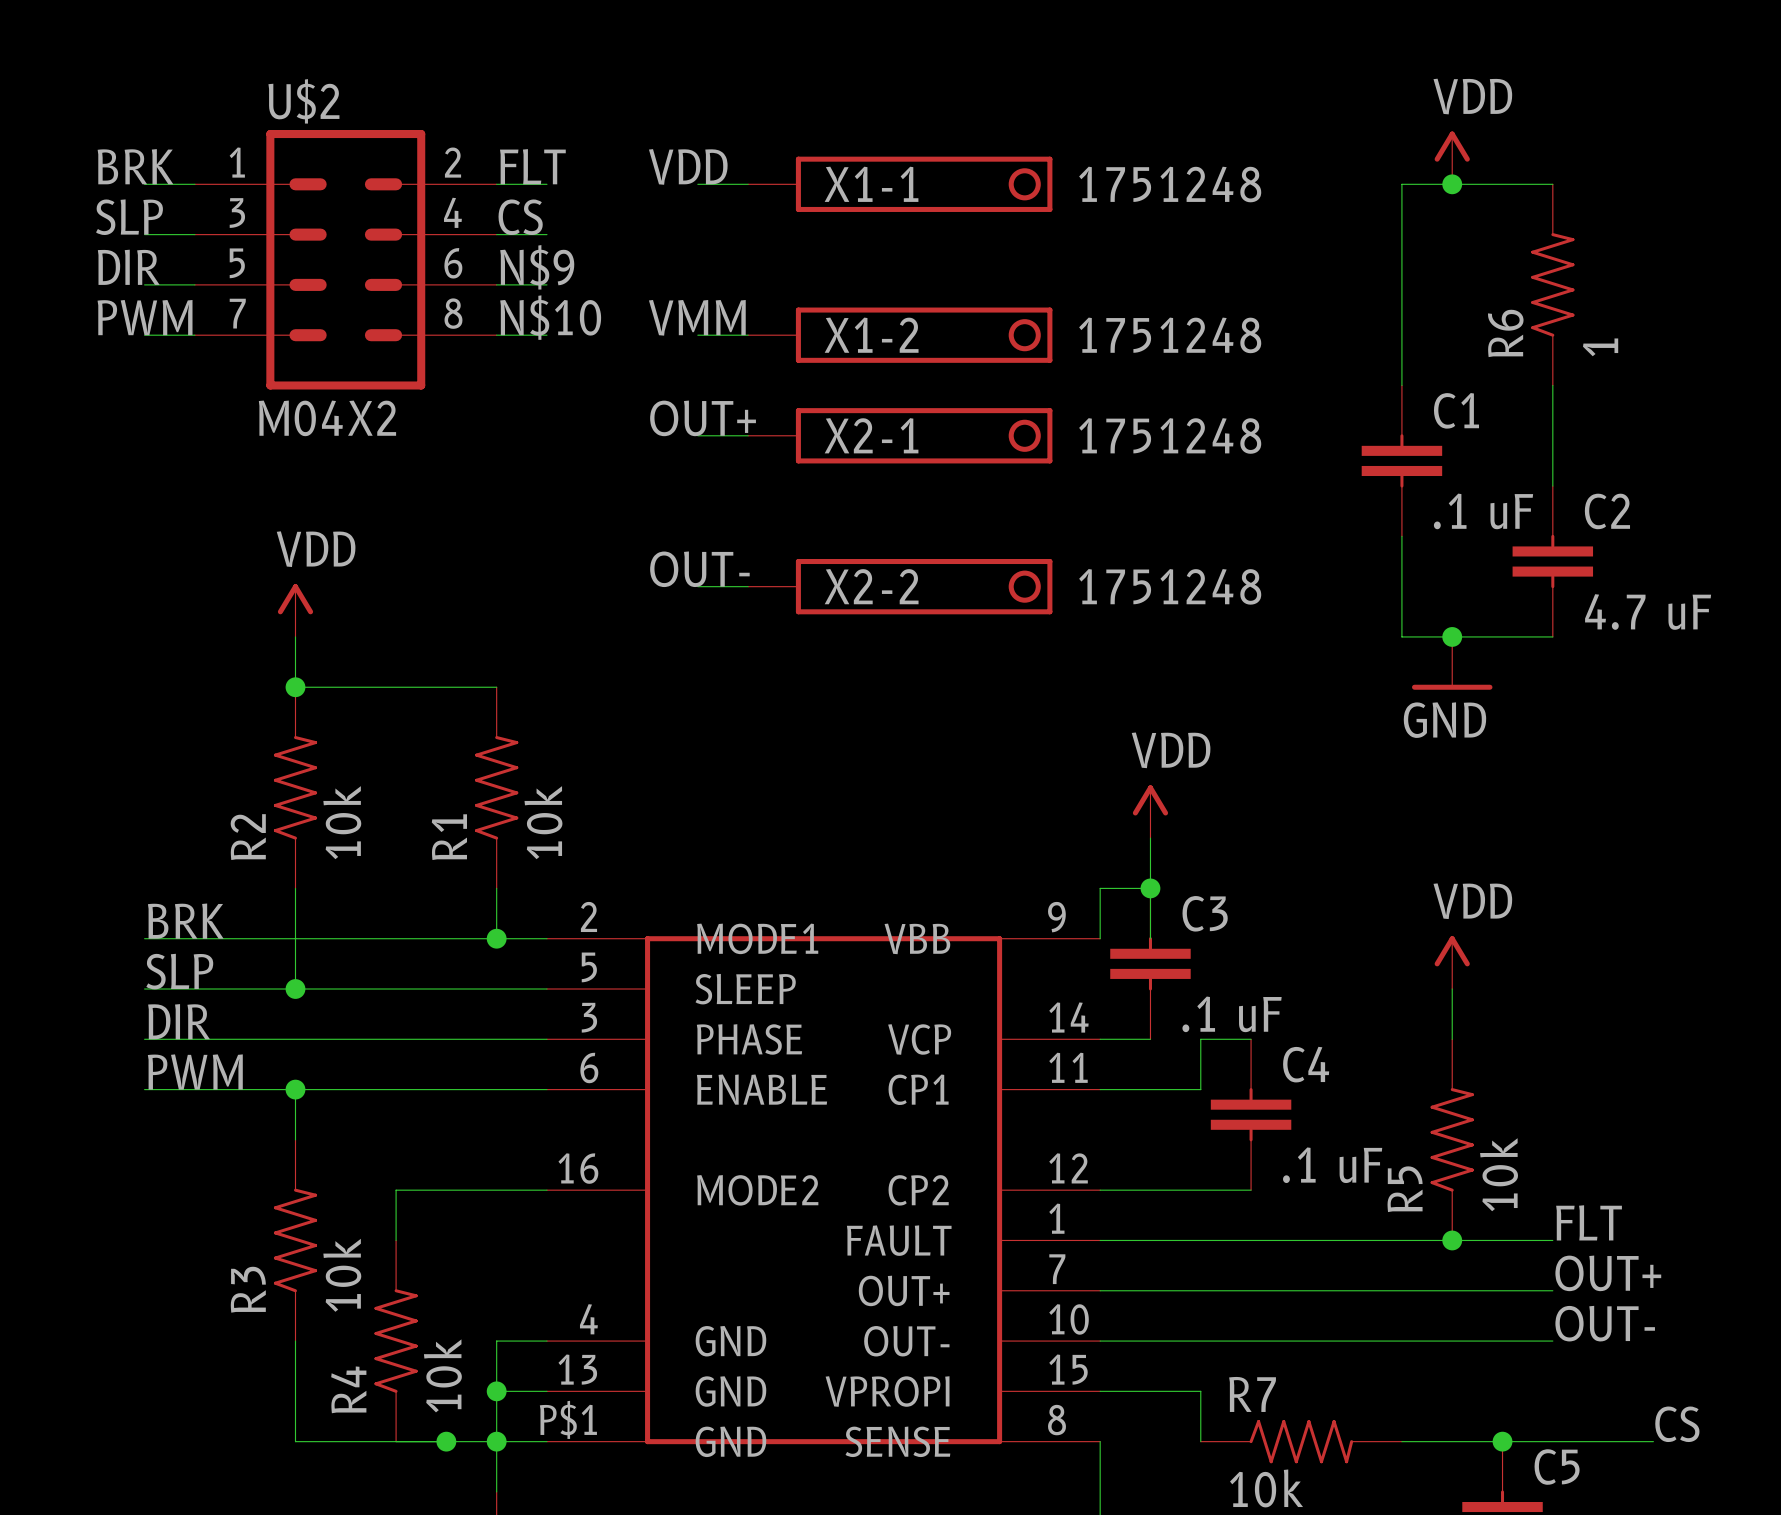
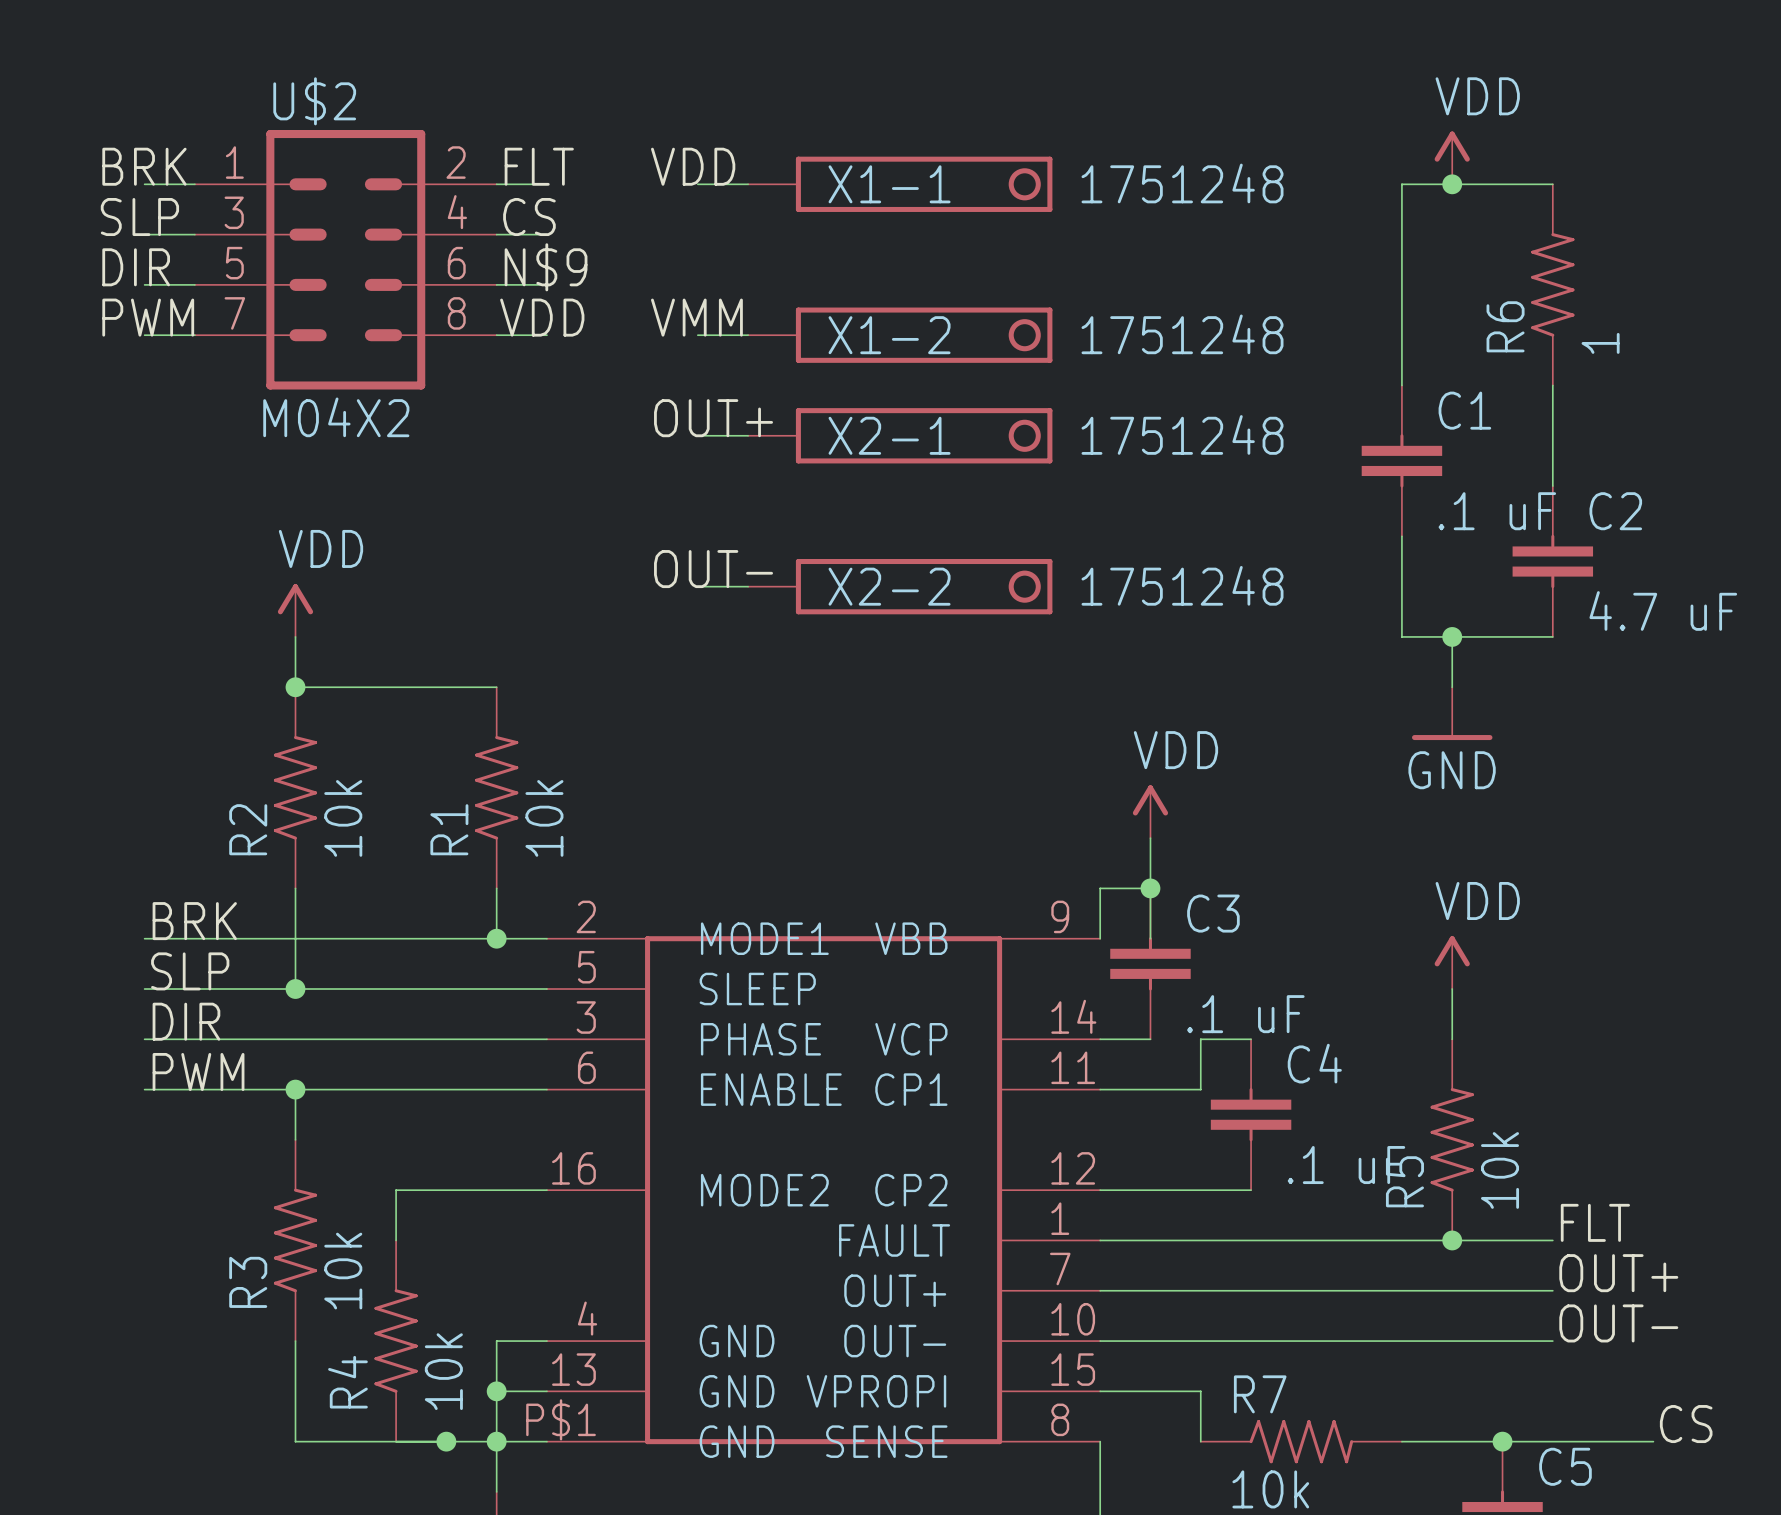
label: N$10 (550, 317) -> VDD (542, 317)
power symbol position: GND (1452, 663) -> GND (1452, 713)

